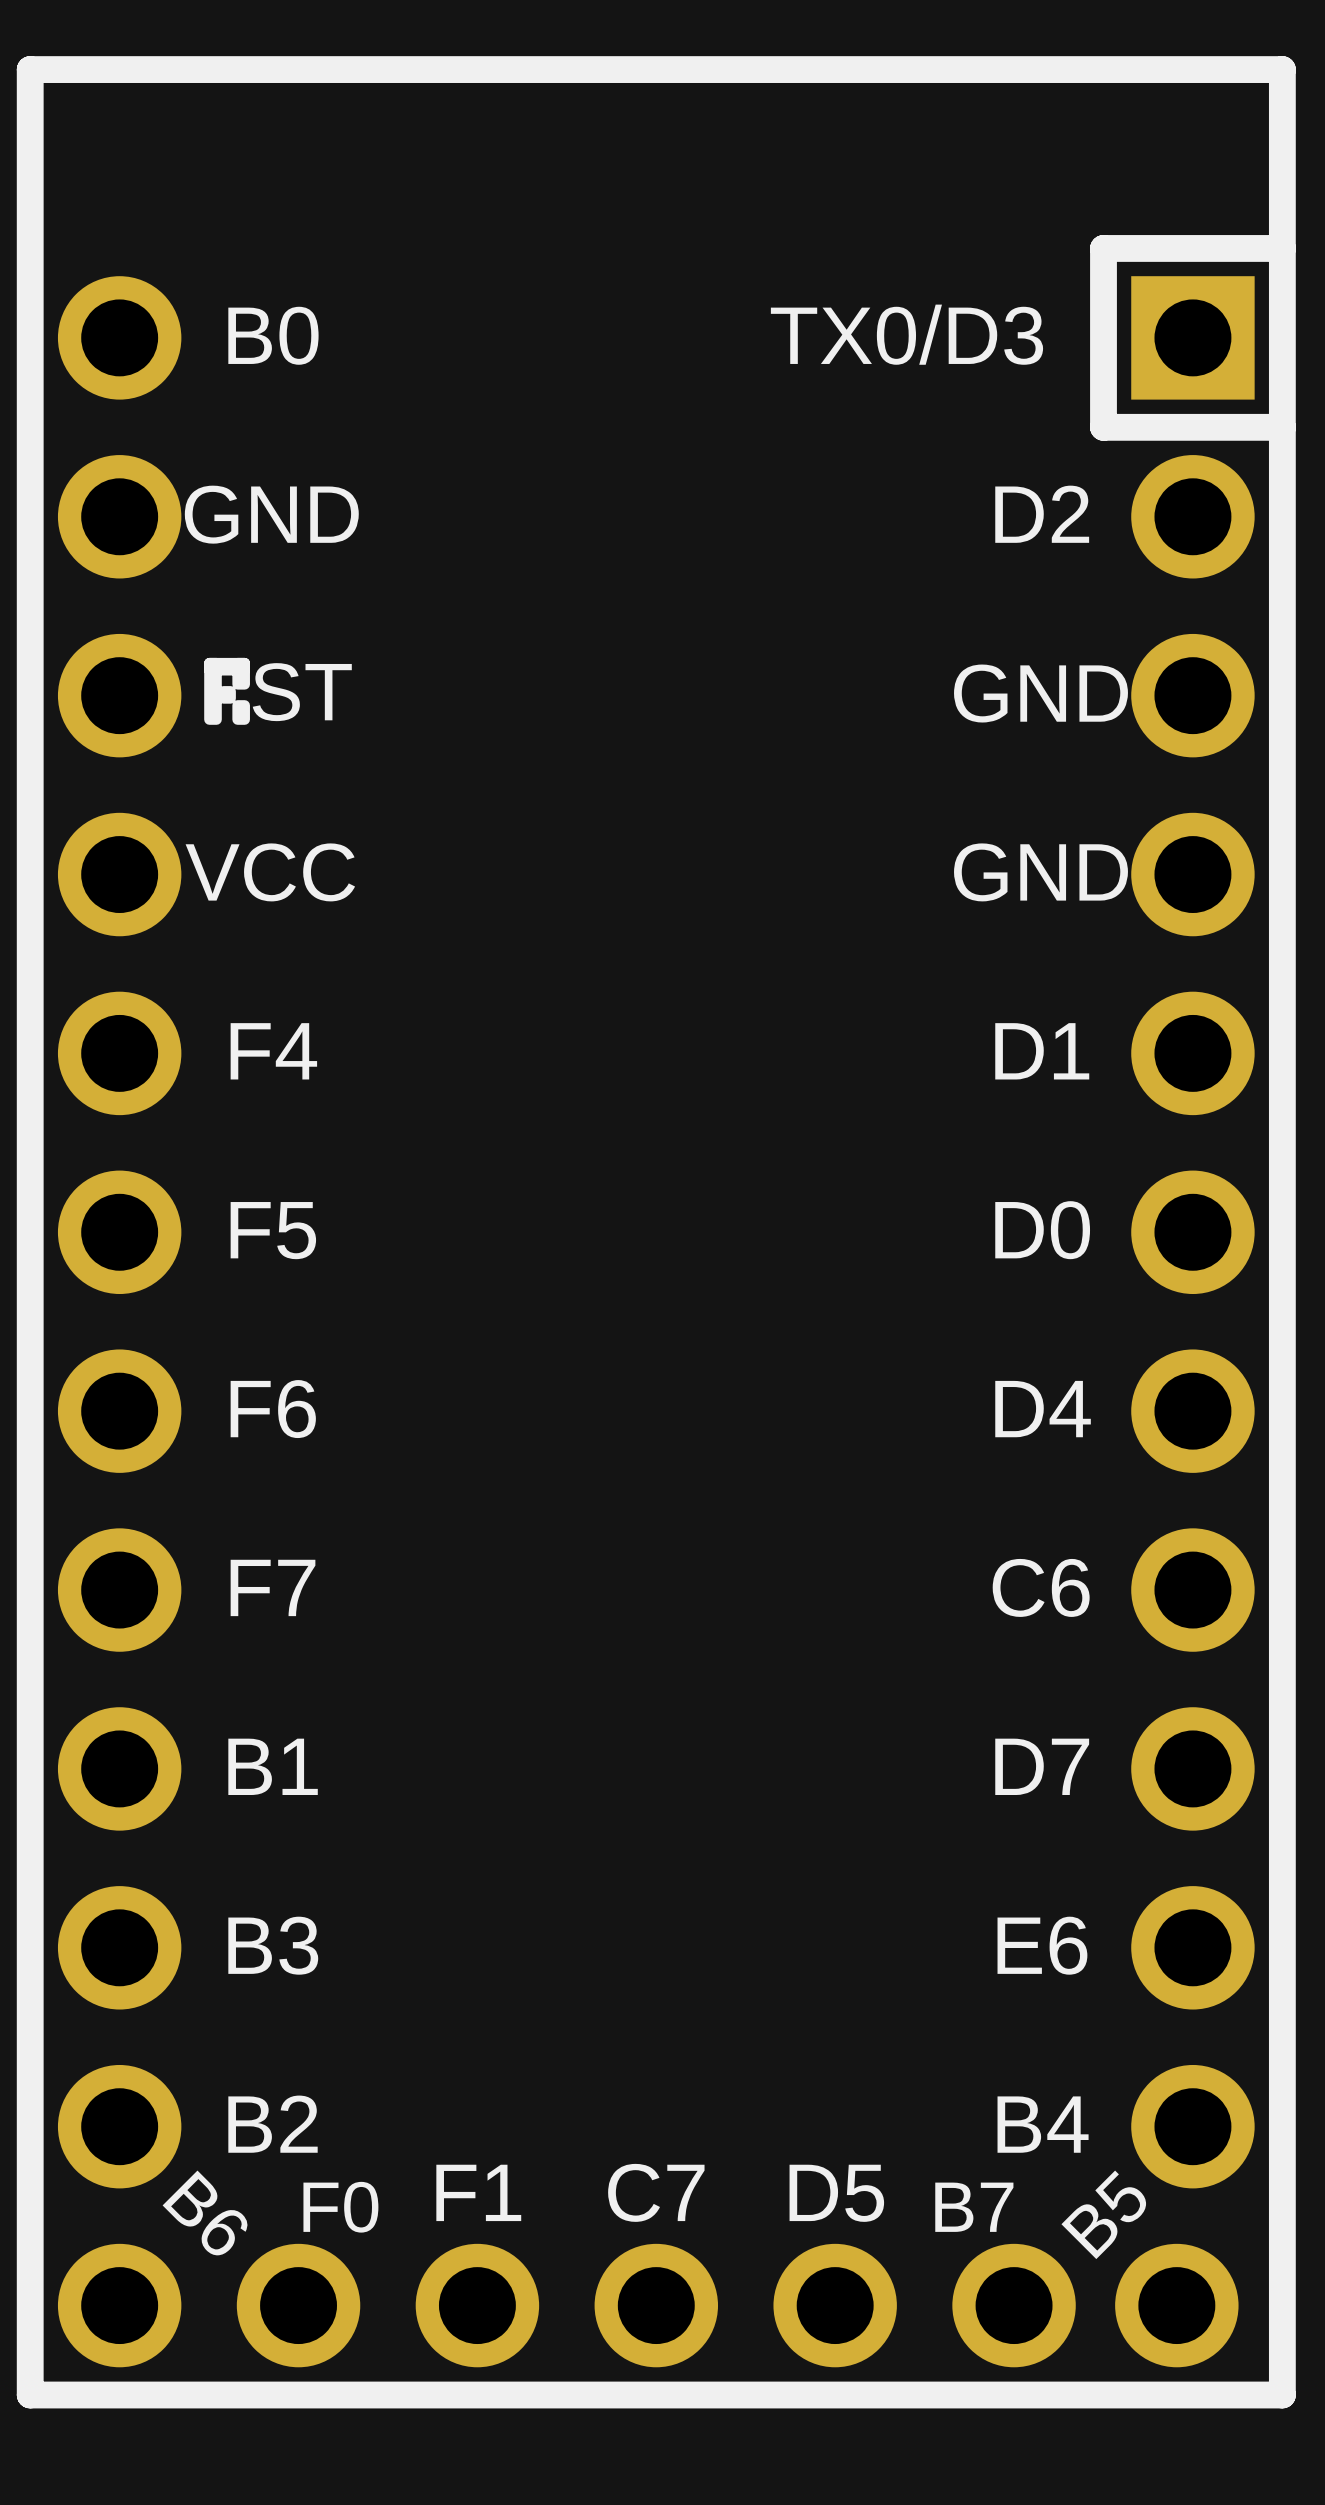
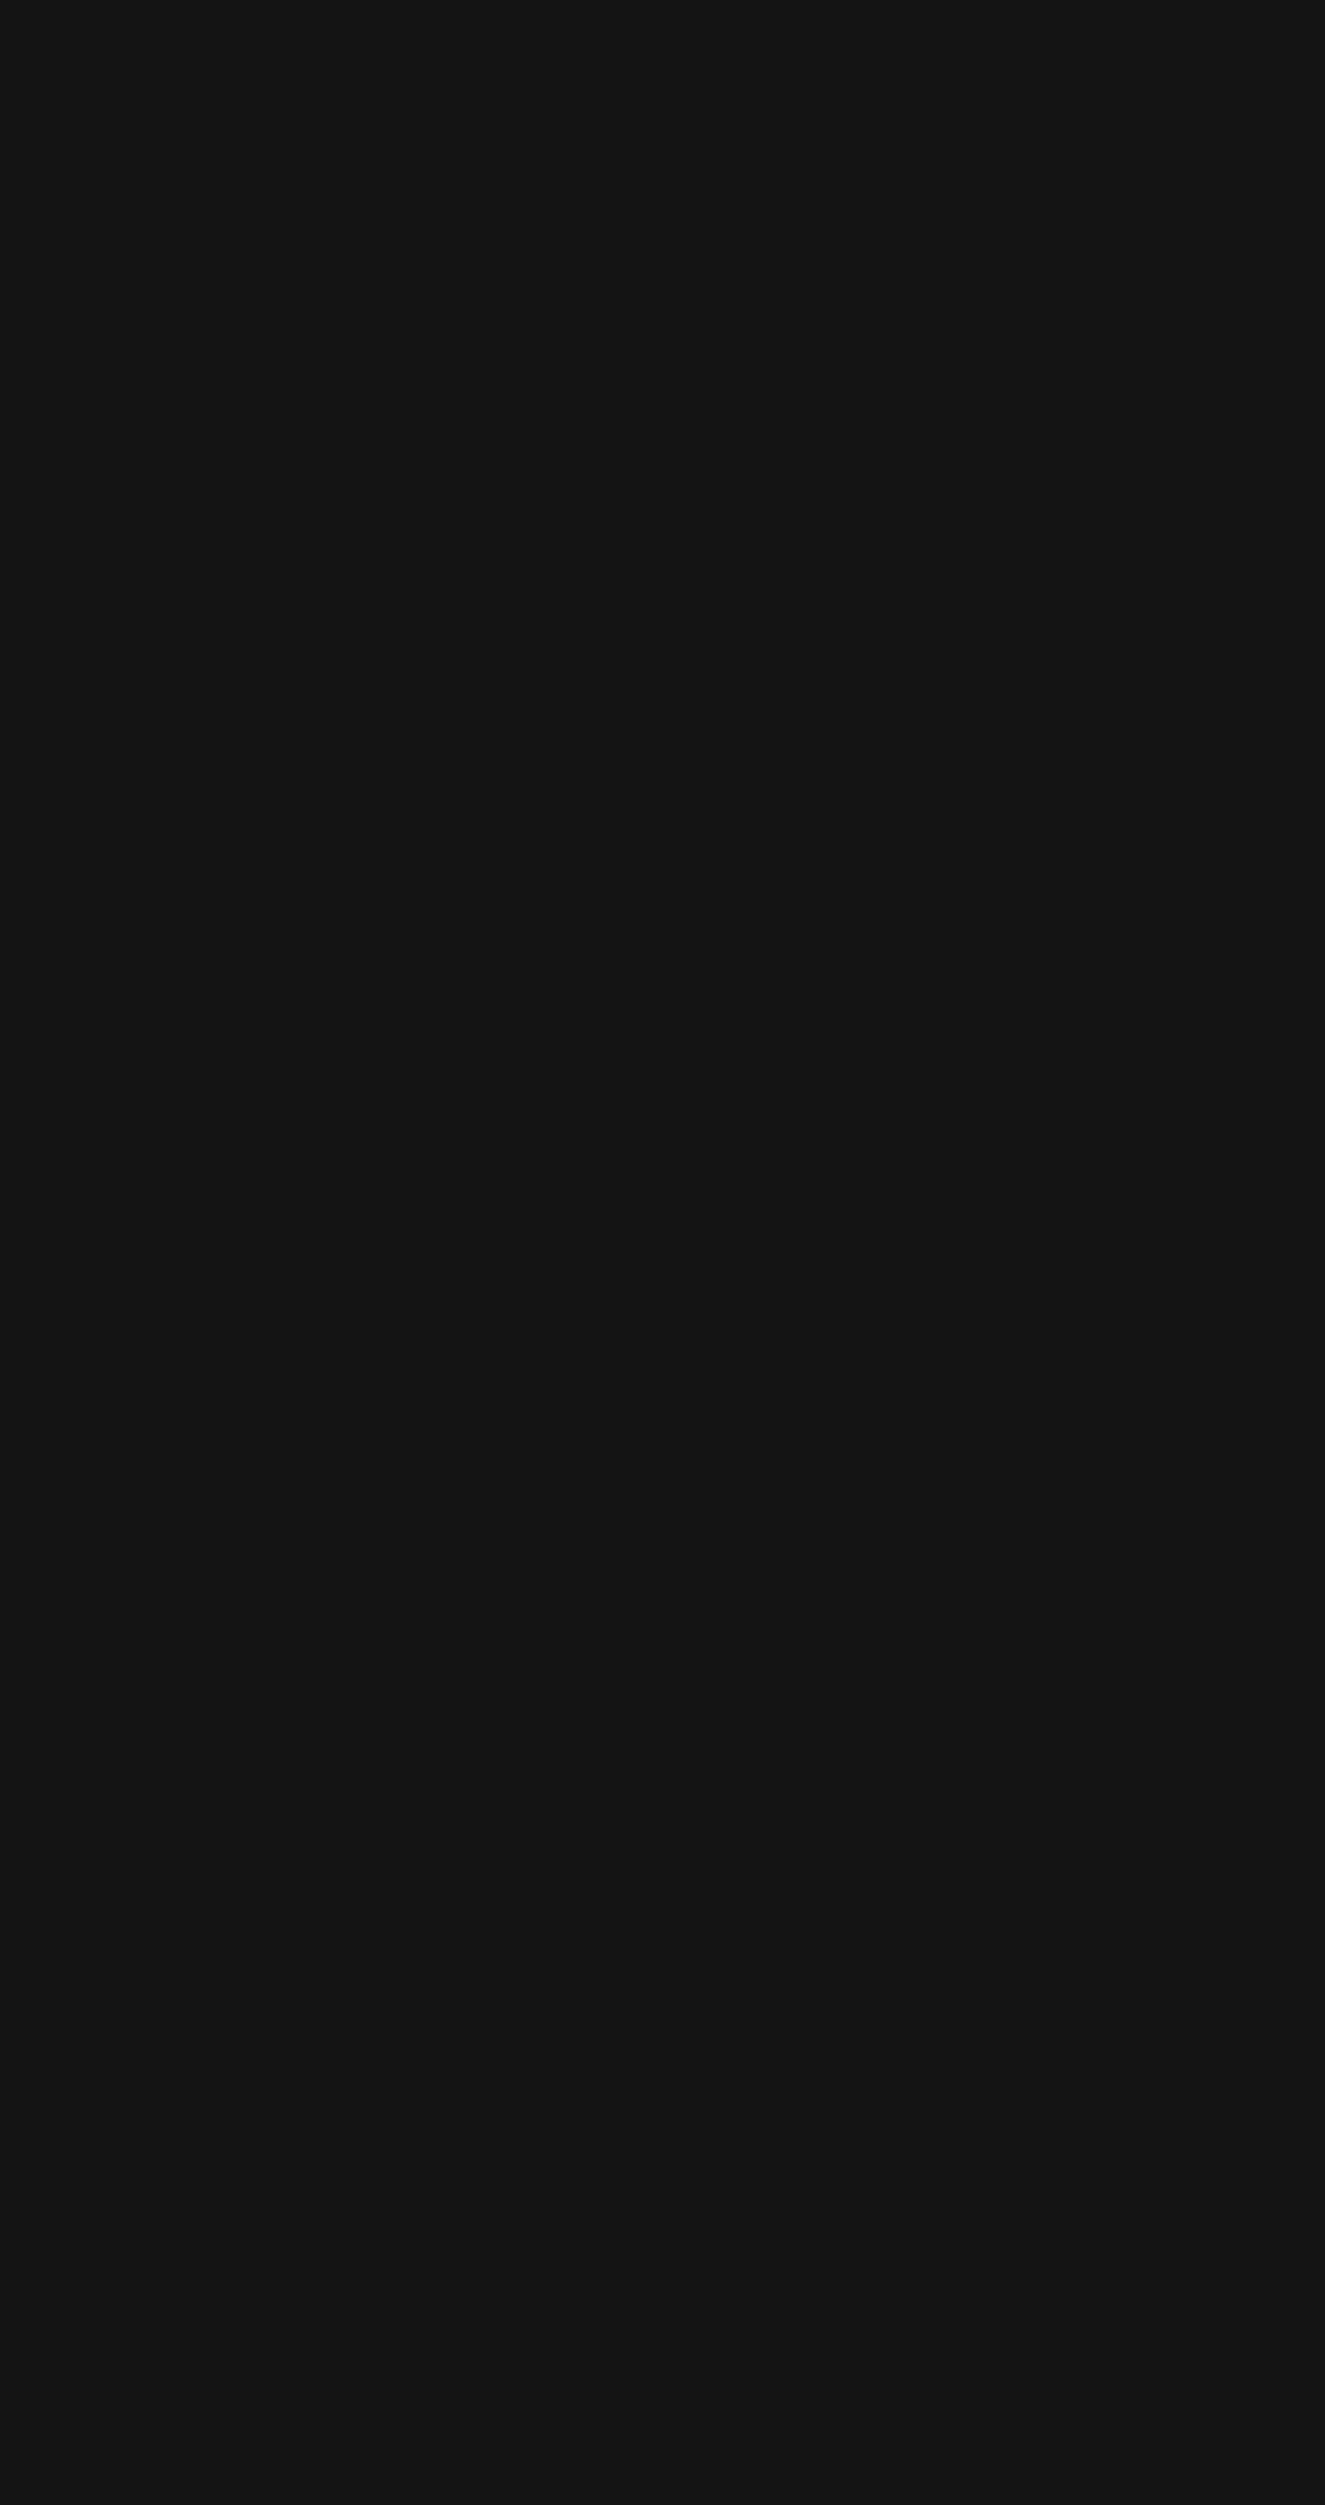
part: (656, 1232) -> none

